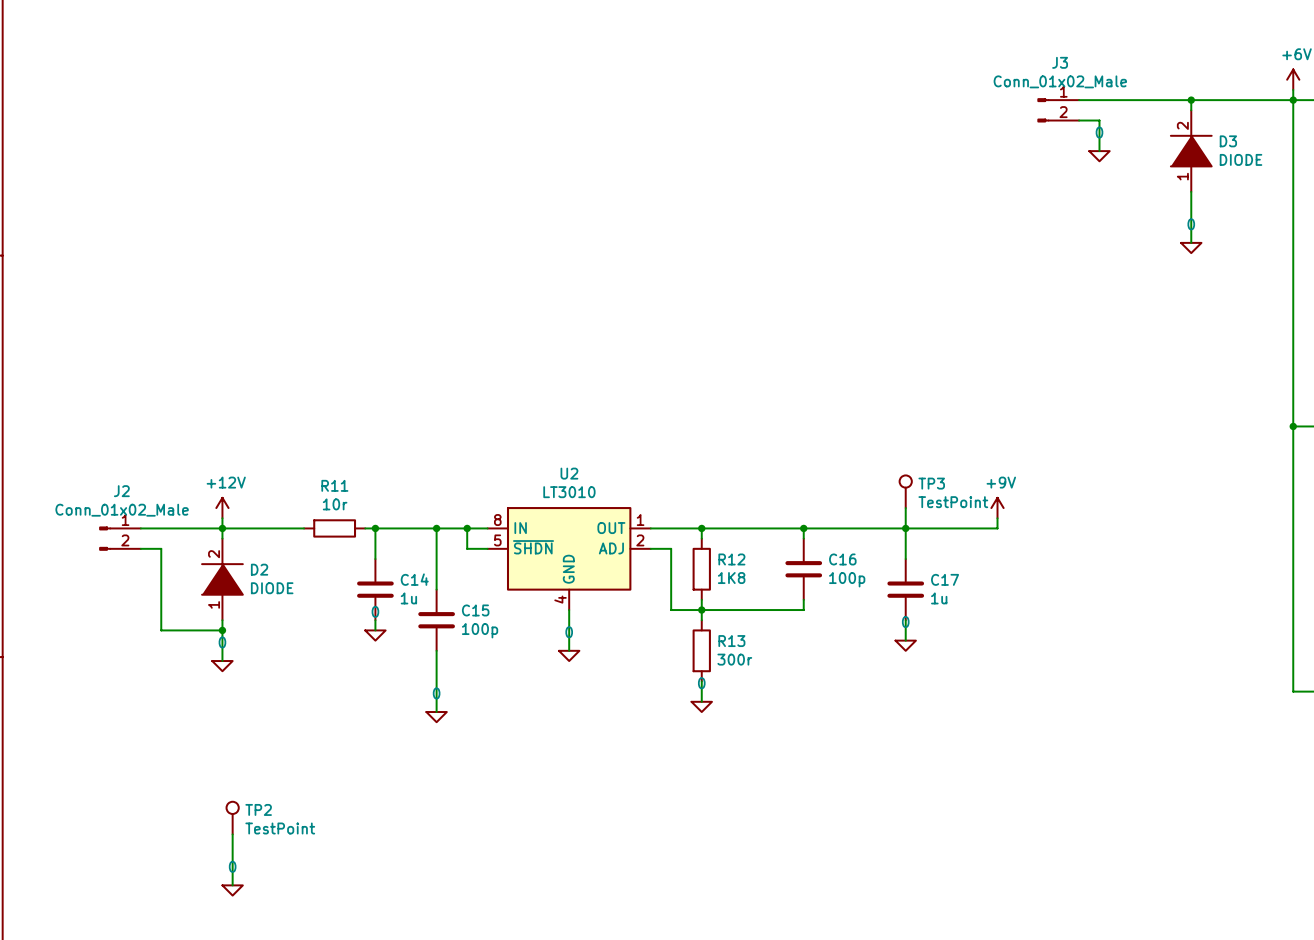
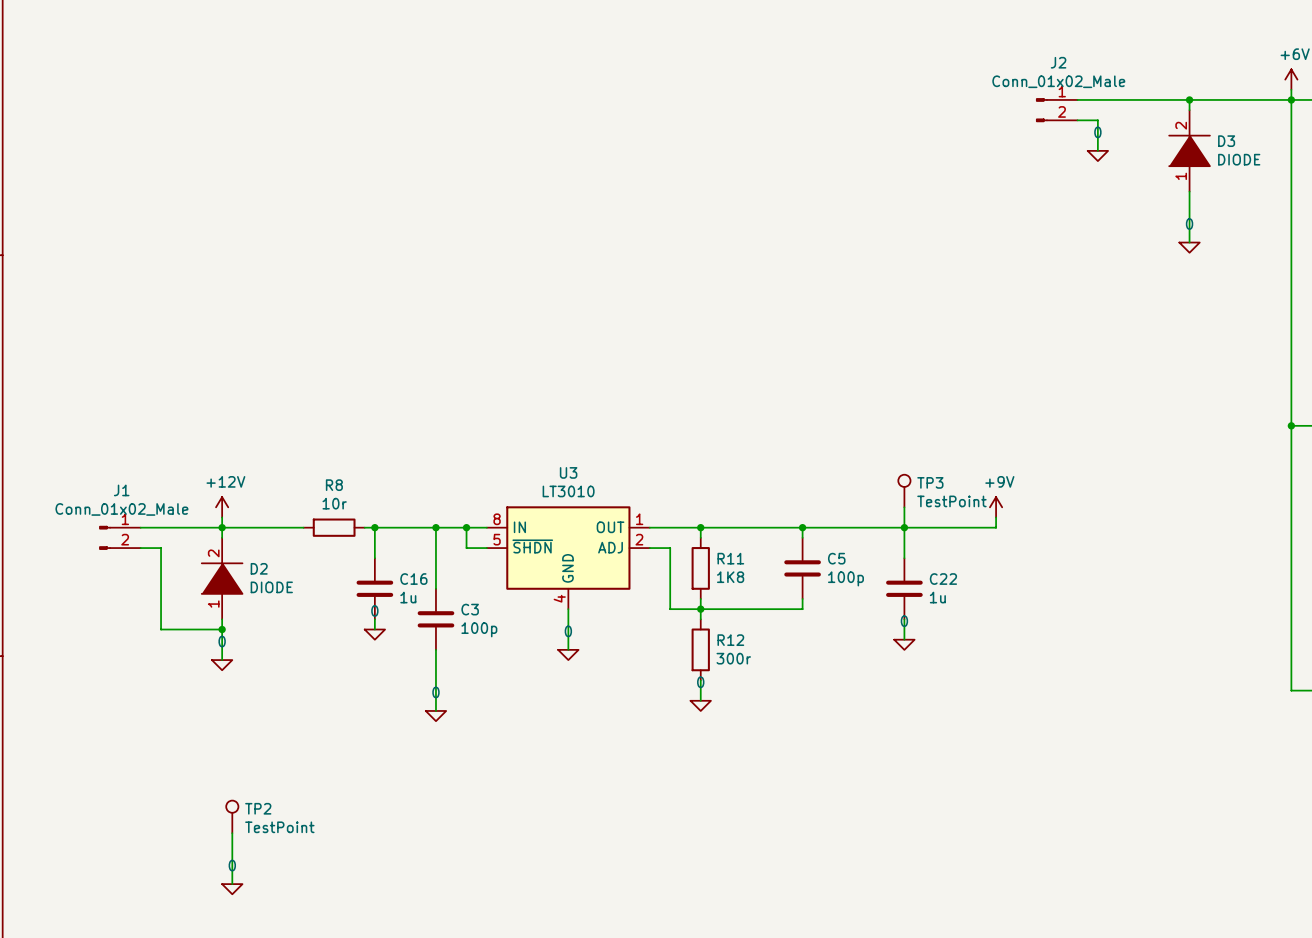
J3 name: J3 (1060, 62) -> J2 (1058, 62)
U2 name: U2 (569, 473) -> U3 (568, 472)
R11 name: R11 (334, 485) -> R8 (334, 485)
J2 name: J2 (121, 491) -> J1 (121, 490)
R12 name: R12 (731, 559) -> R11 (730, 558)
C16 name: C16 (842, 559) -> C5 (836, 558)
C14 name: C14 (414, 579) -> C16 (413, 579)
C17 name: C17 (945, 579) -> C22 (943, 579)
C15 name: C15 (475, 610) -> C3 (470, 609)
R13 name: R13 (731, 641) -> R12 (730, 640)

